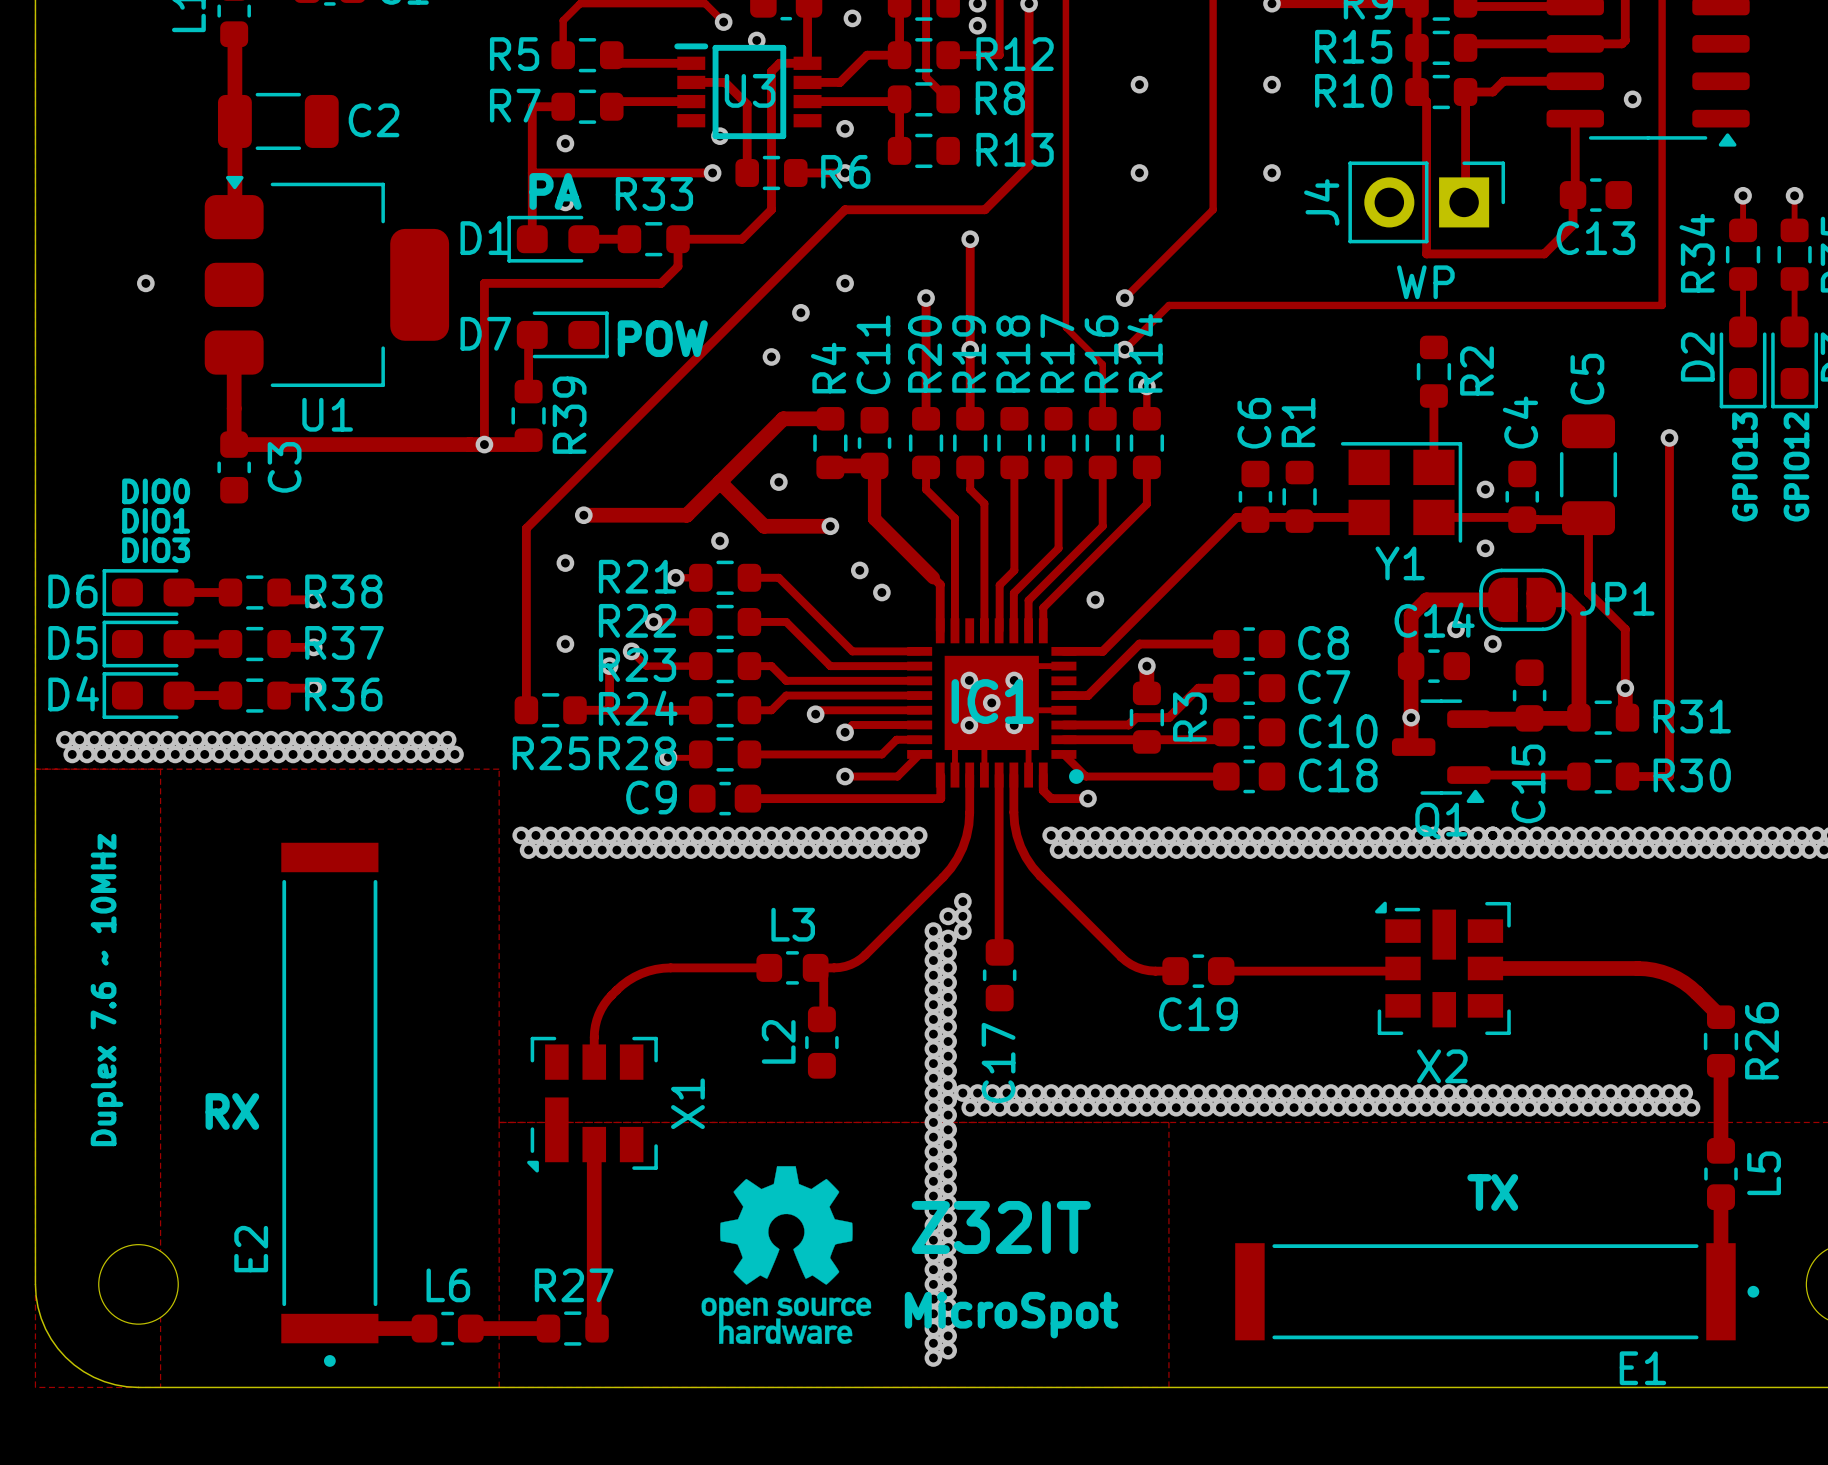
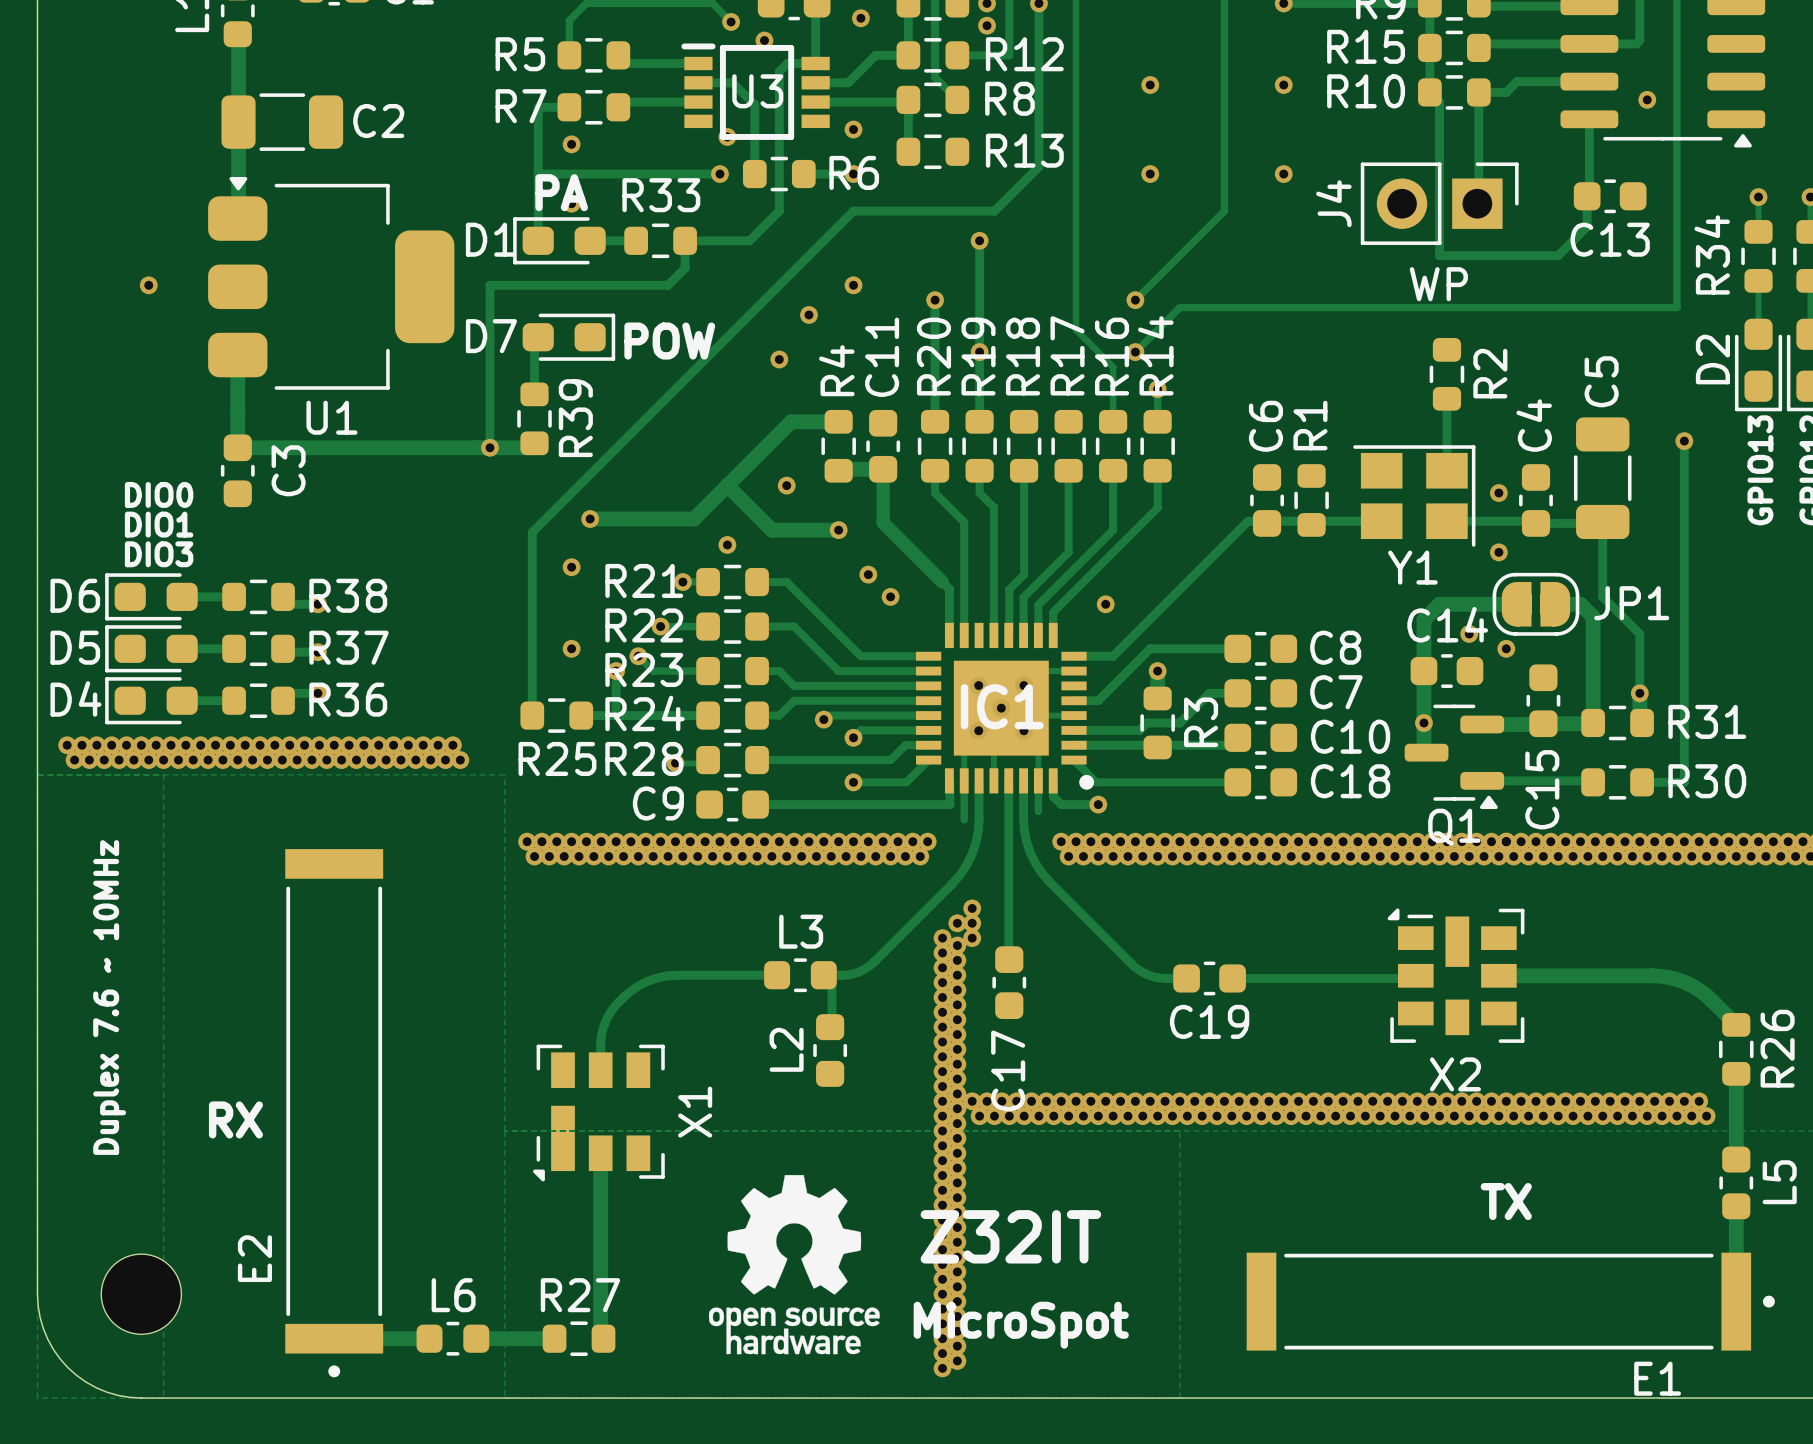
track: none -> (964, 780) (964, 819)
track: none -> (1038, 780) (1038, 811)

